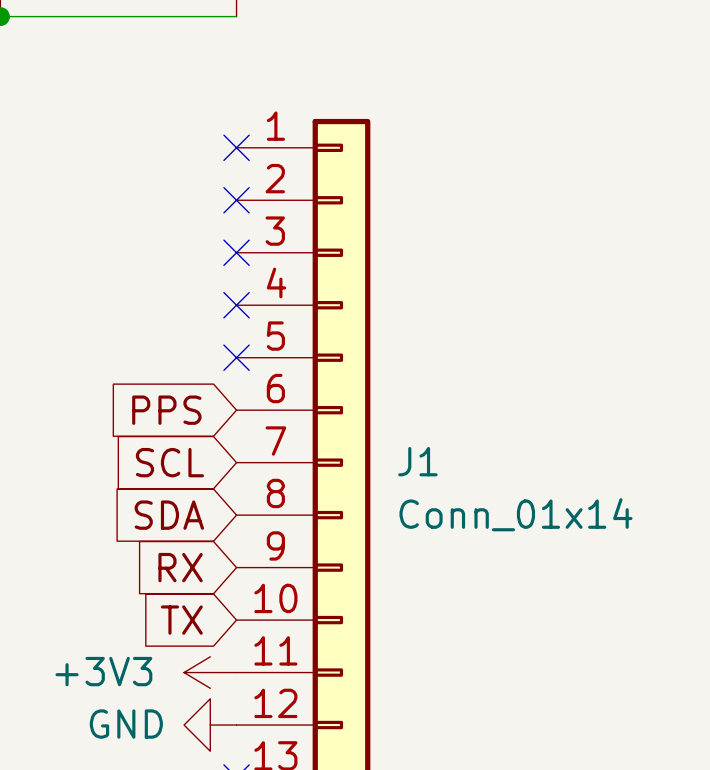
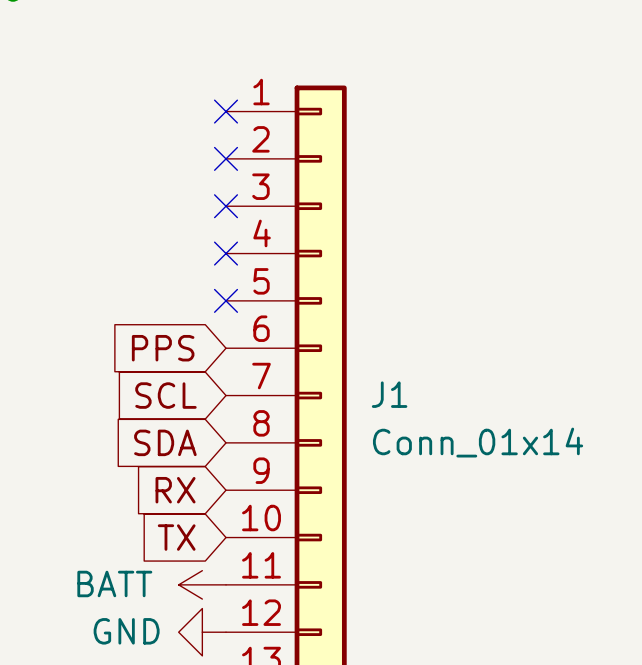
power symbol: +3V3 (210, 672) -> BATT (202, 584)

